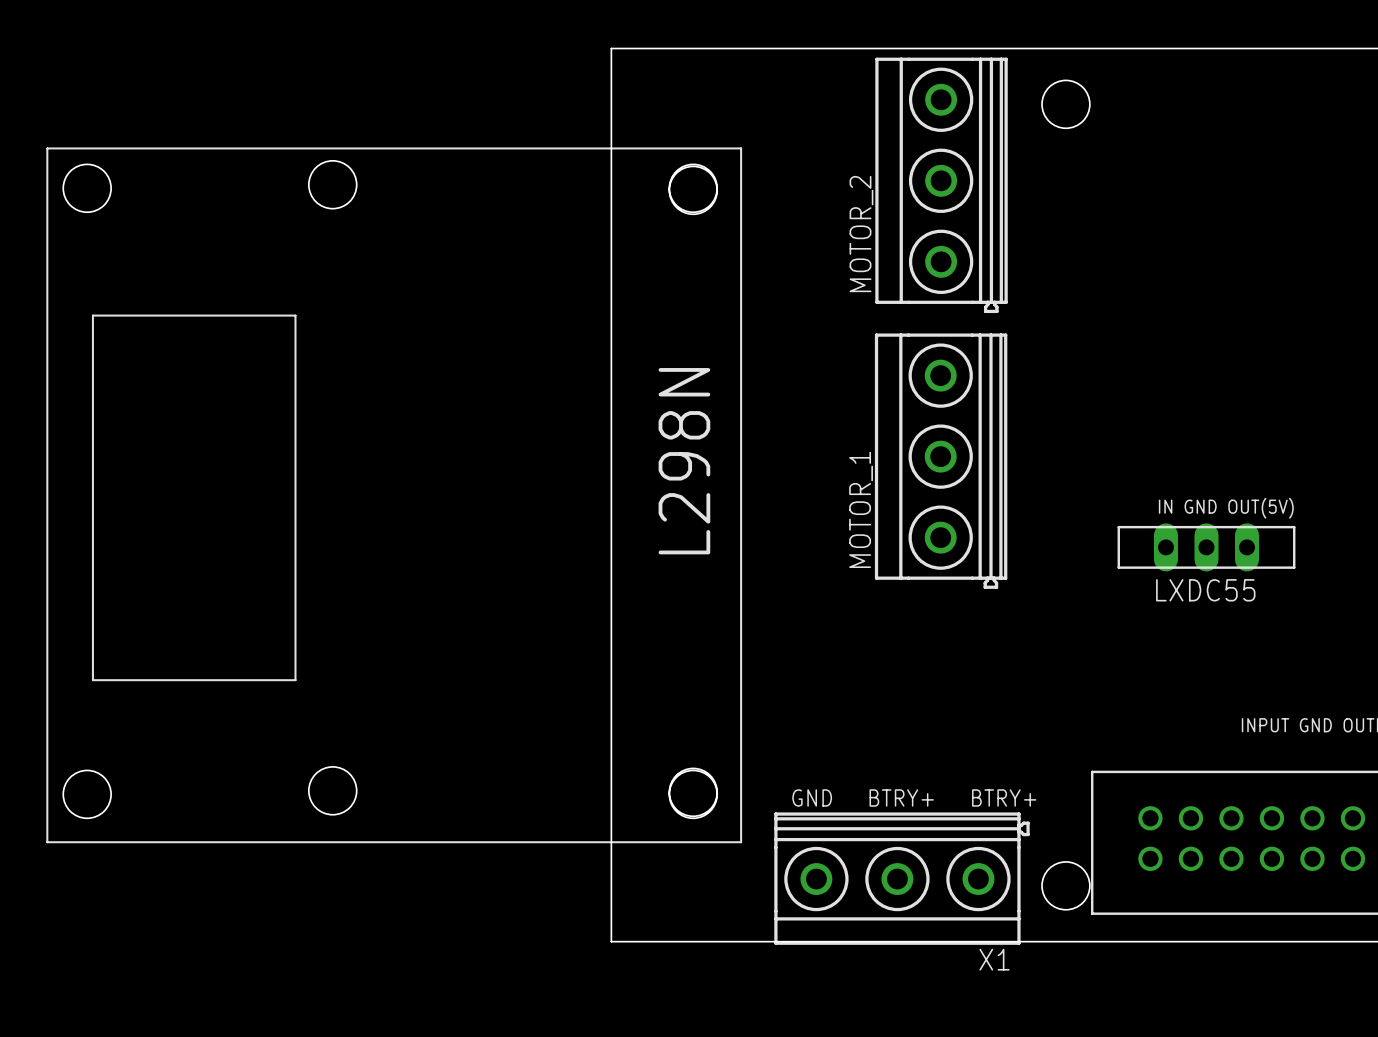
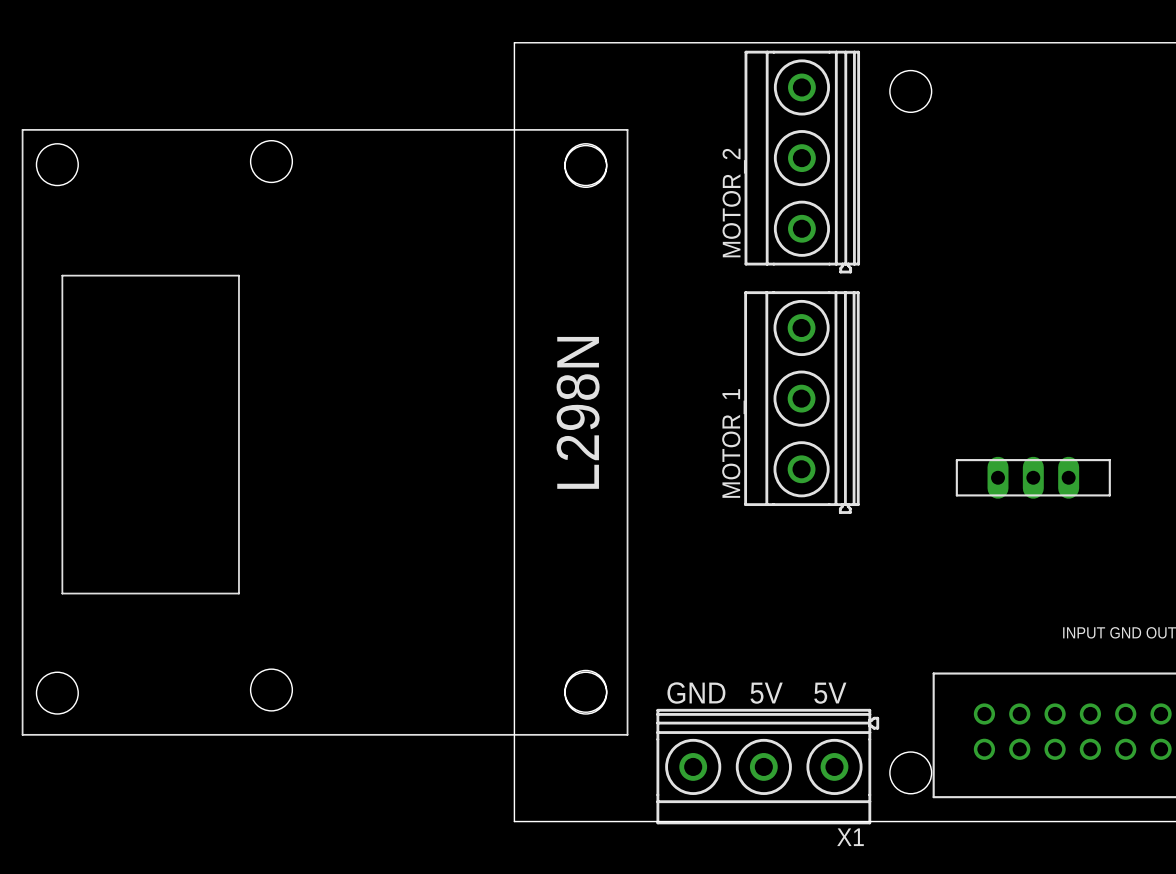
text: IN GND OUT(5V) (1226, 508) -> none
text: LXDC55 (1205, 590) -> none
text: GND BTRY+ BTRY+ (914, 797) -> GND 5V 5V (756, 693)

